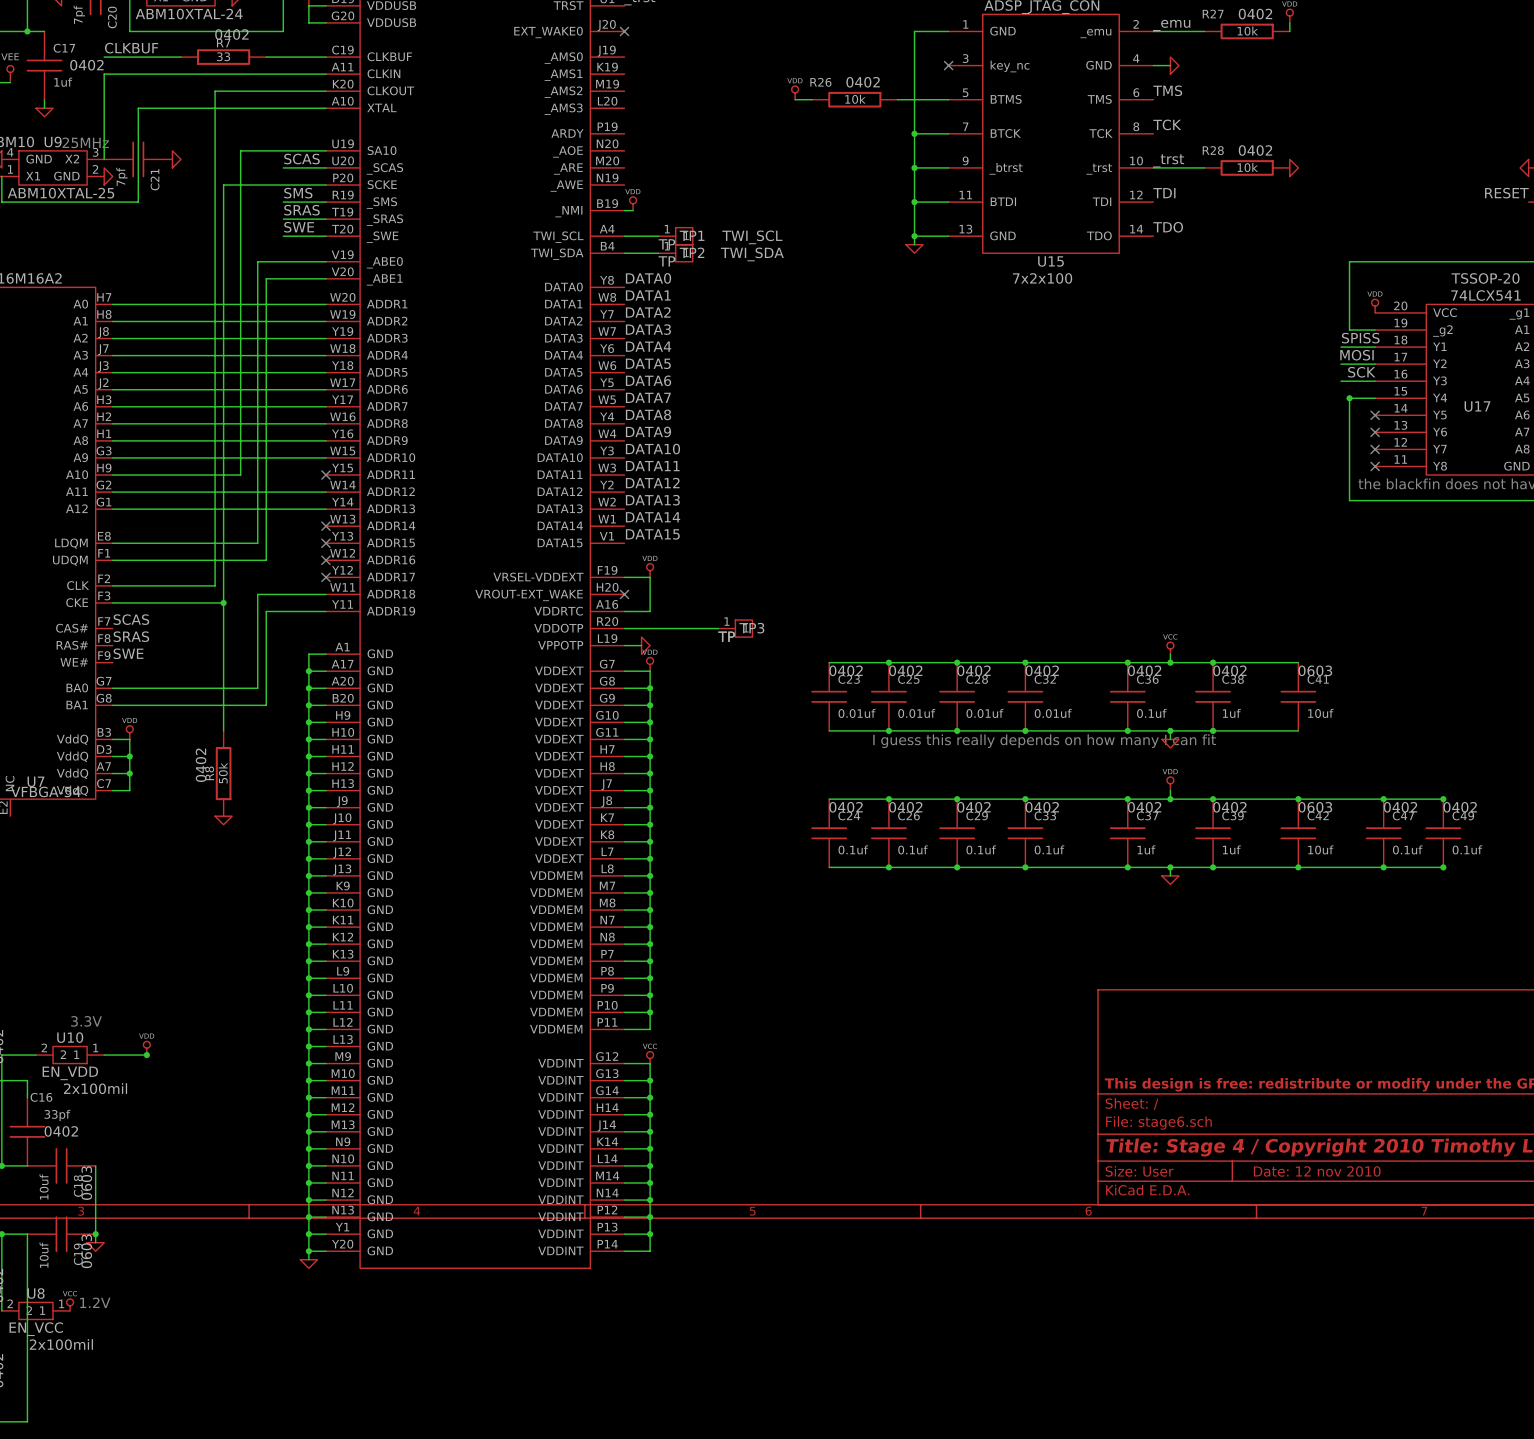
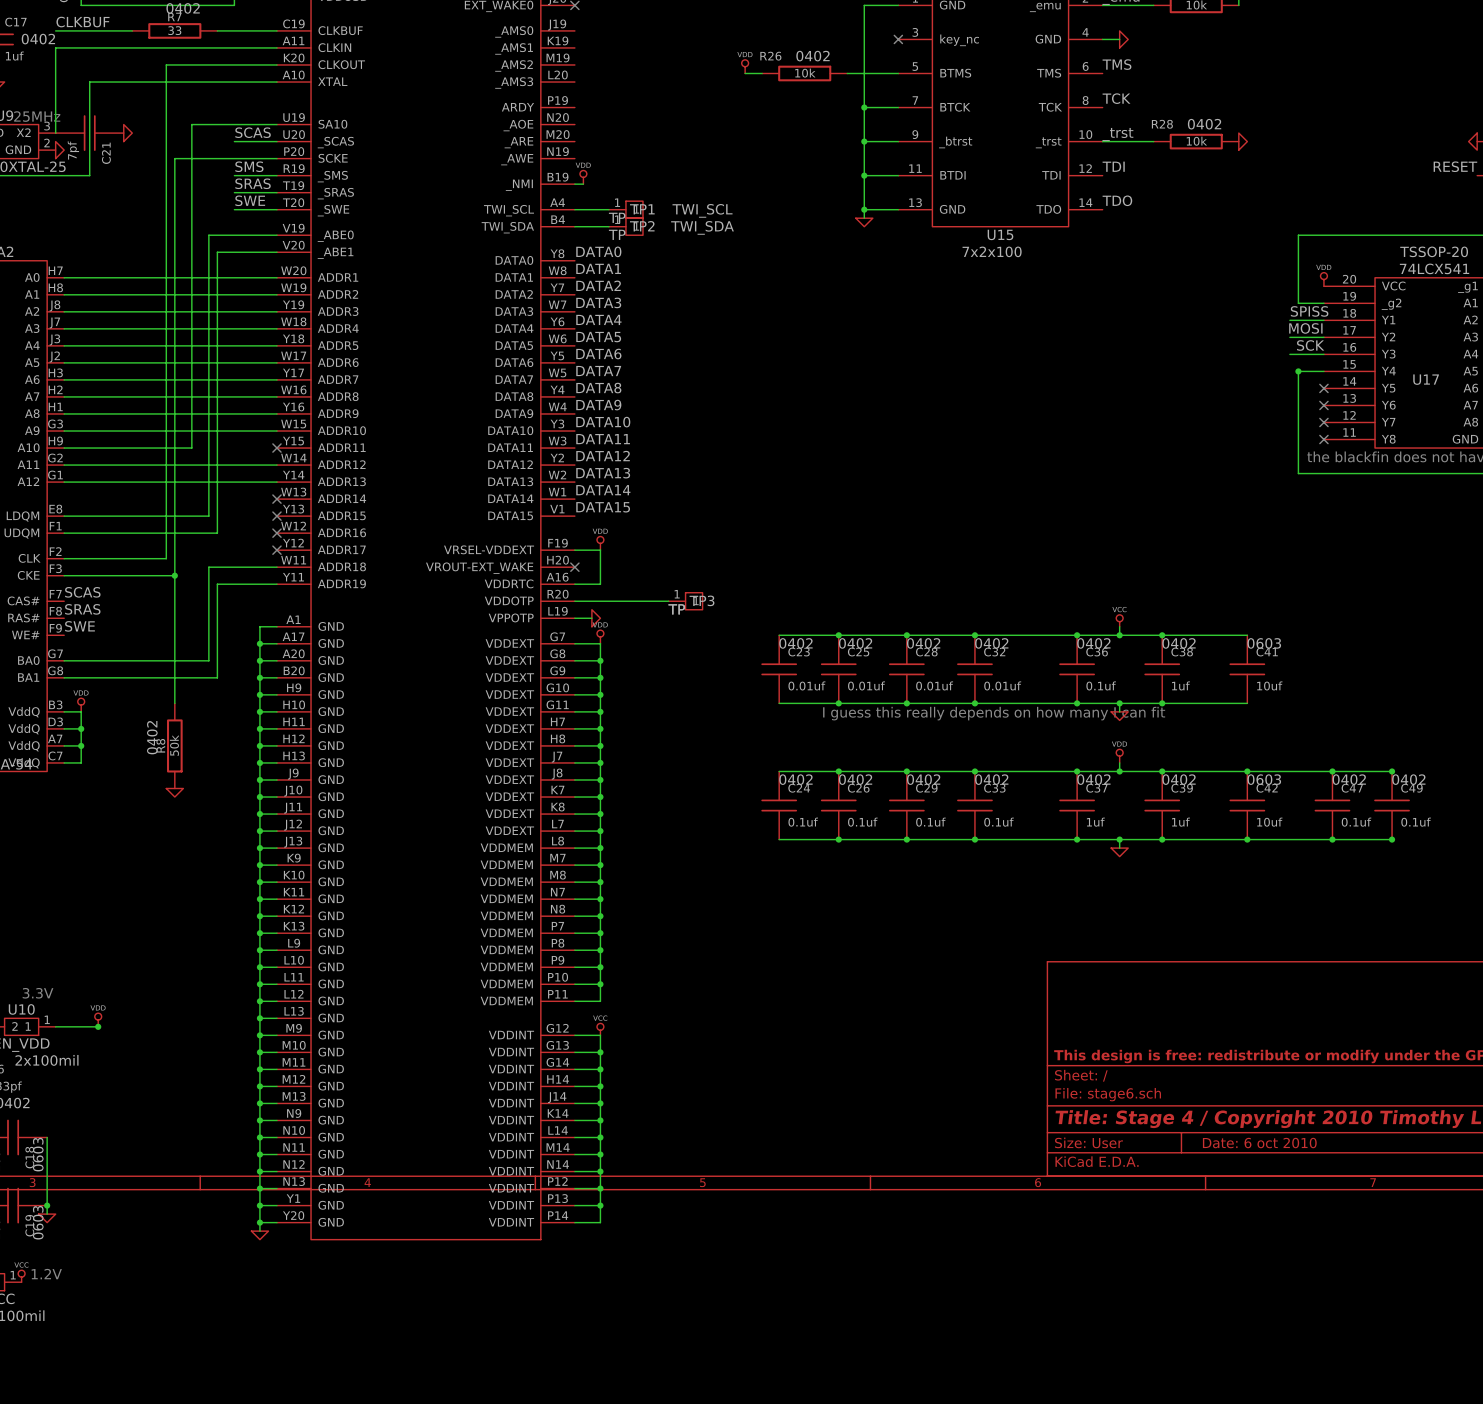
title block: Date: 12 nov 2010 (1317, 1171) -> Date: 6 oct 2010 (1259, 1143)

